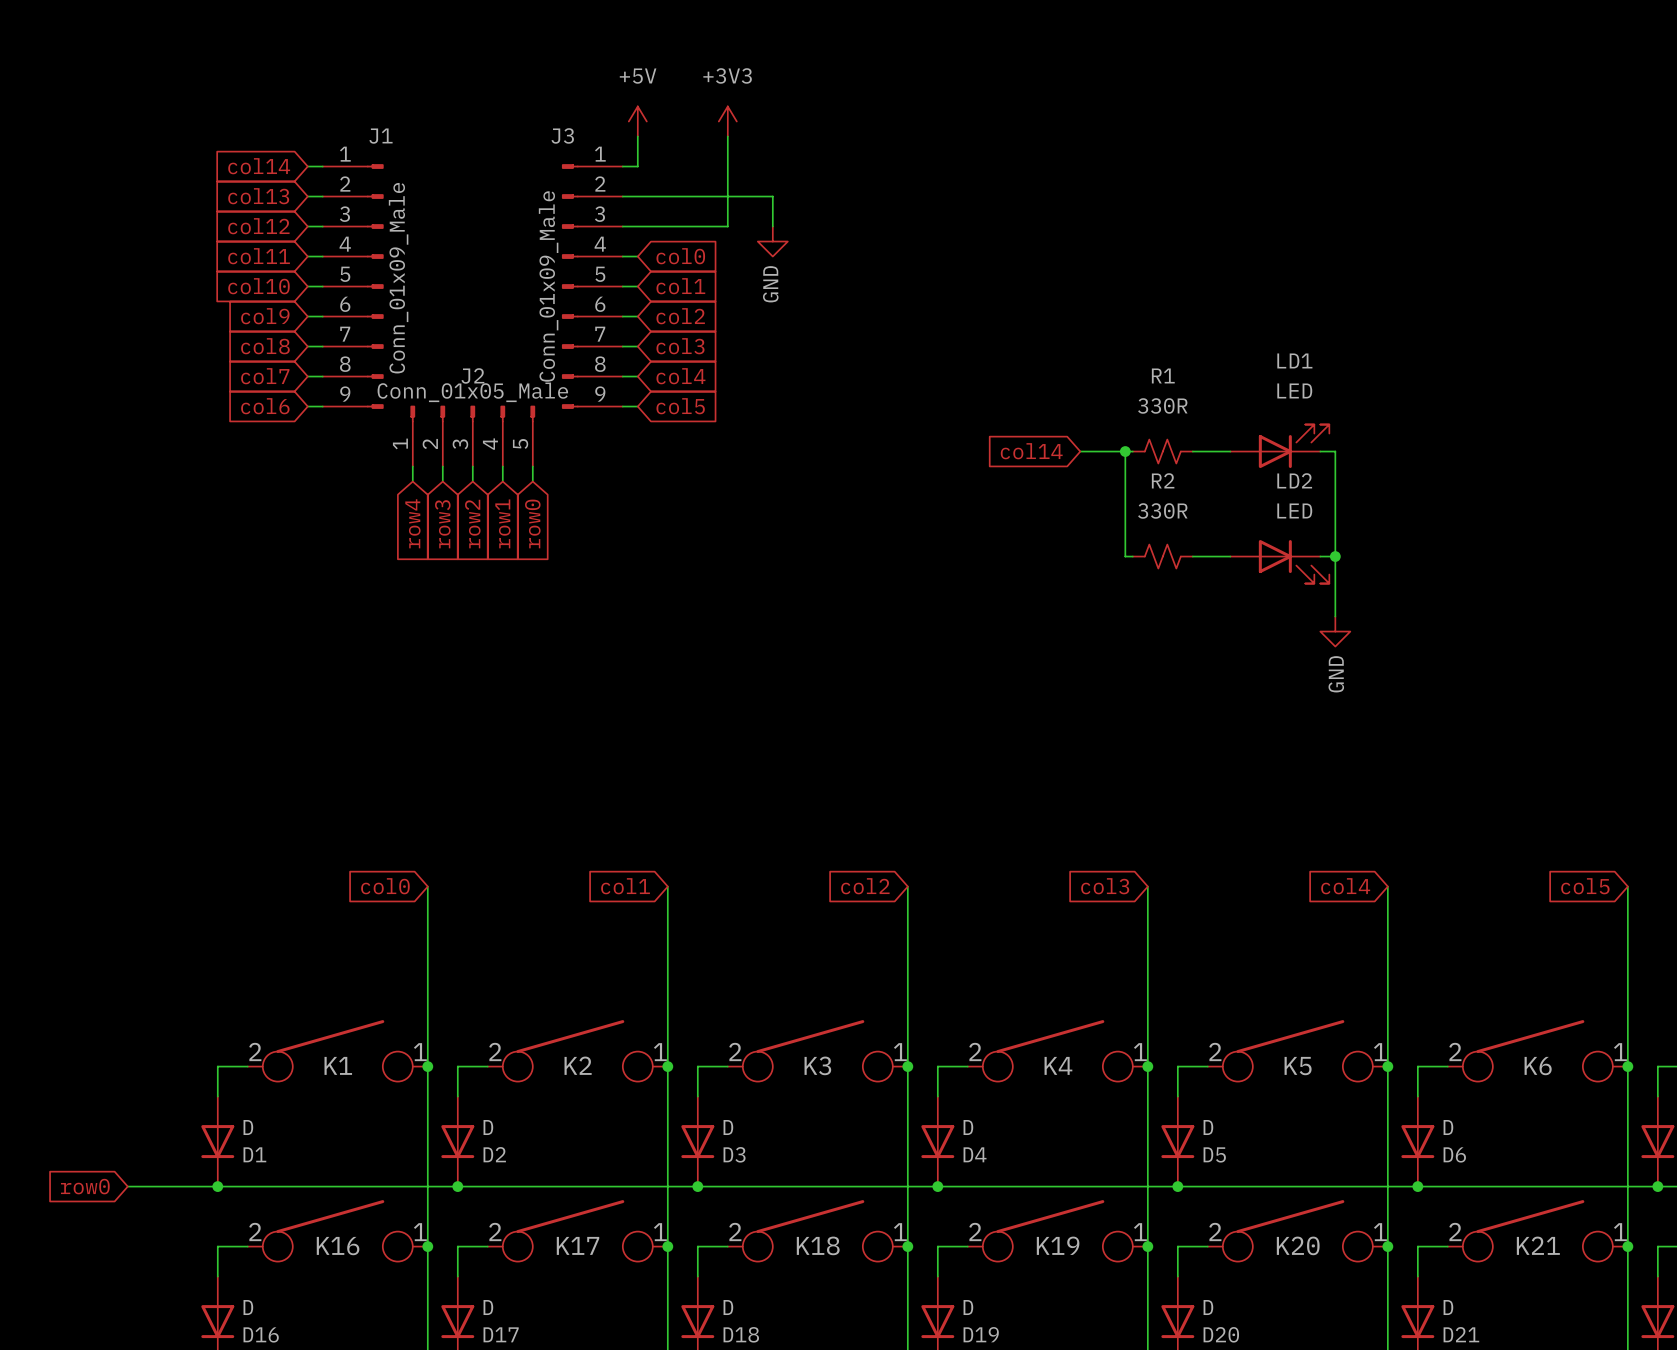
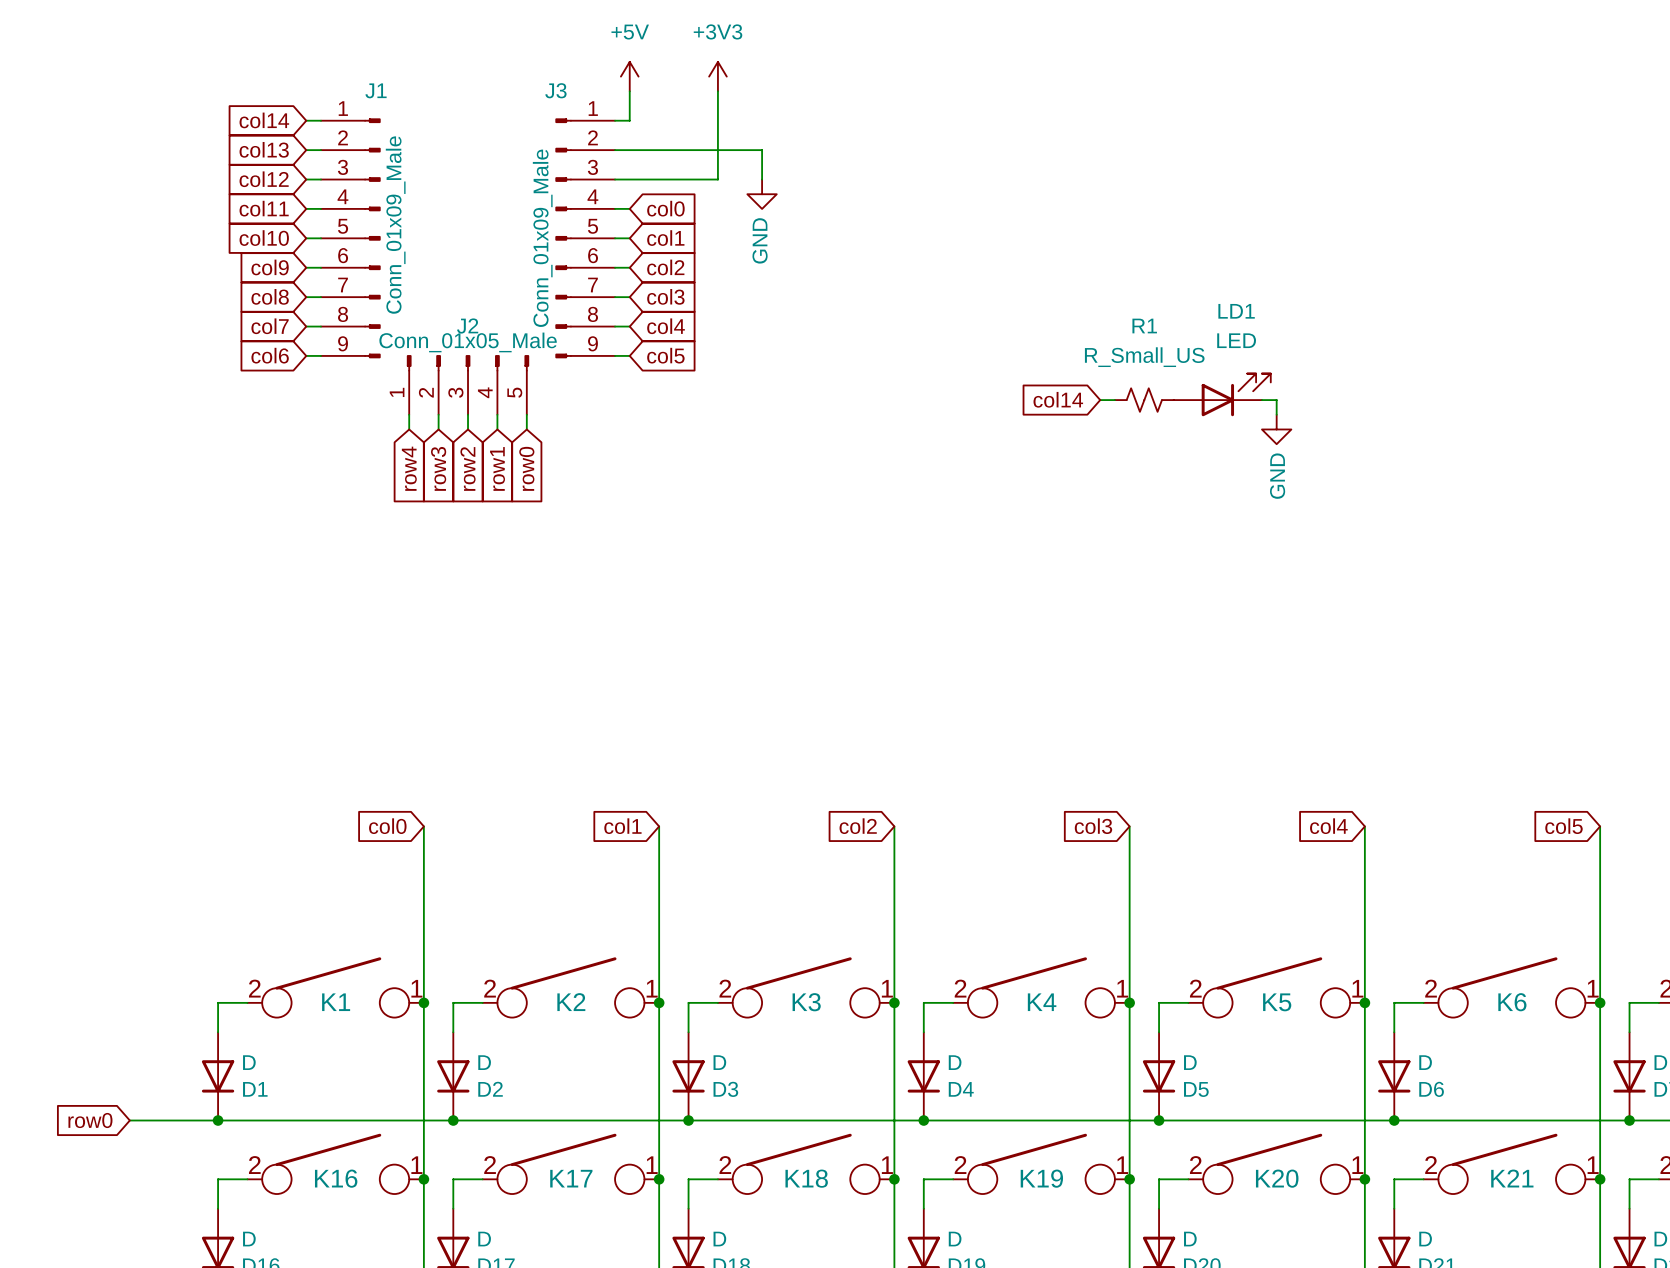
R1 value: 330R (1162, 405) -> R_Small_US (1144, 357)
LD1 position: (1279, 446) -> (1222, 394)
global label position: col14 (1031, 451) -> col14 (1058, 399)
wire: (1080, 451) (1117, 451) -> none
wire: (1125, 451) (1125, 556) (1132, 556) -> none
junction: (1125, 451) -> none
wire: none -> (1261, 400) (1276, 400) (1276, 414)
wire: (1320, 451) (1335, 451) (1335, 616) -> none
R2: 330R (1162, 556) -> none
wire: (1192, 556) (1230, 556) -> none
wire: (1320, 556) (1335, 556) -> none
junction: (1335, 556) -> none
LD2: LED (1279, 561) -> none
power symbol position: GND (1335, 631) -> GND (1276, 429)

